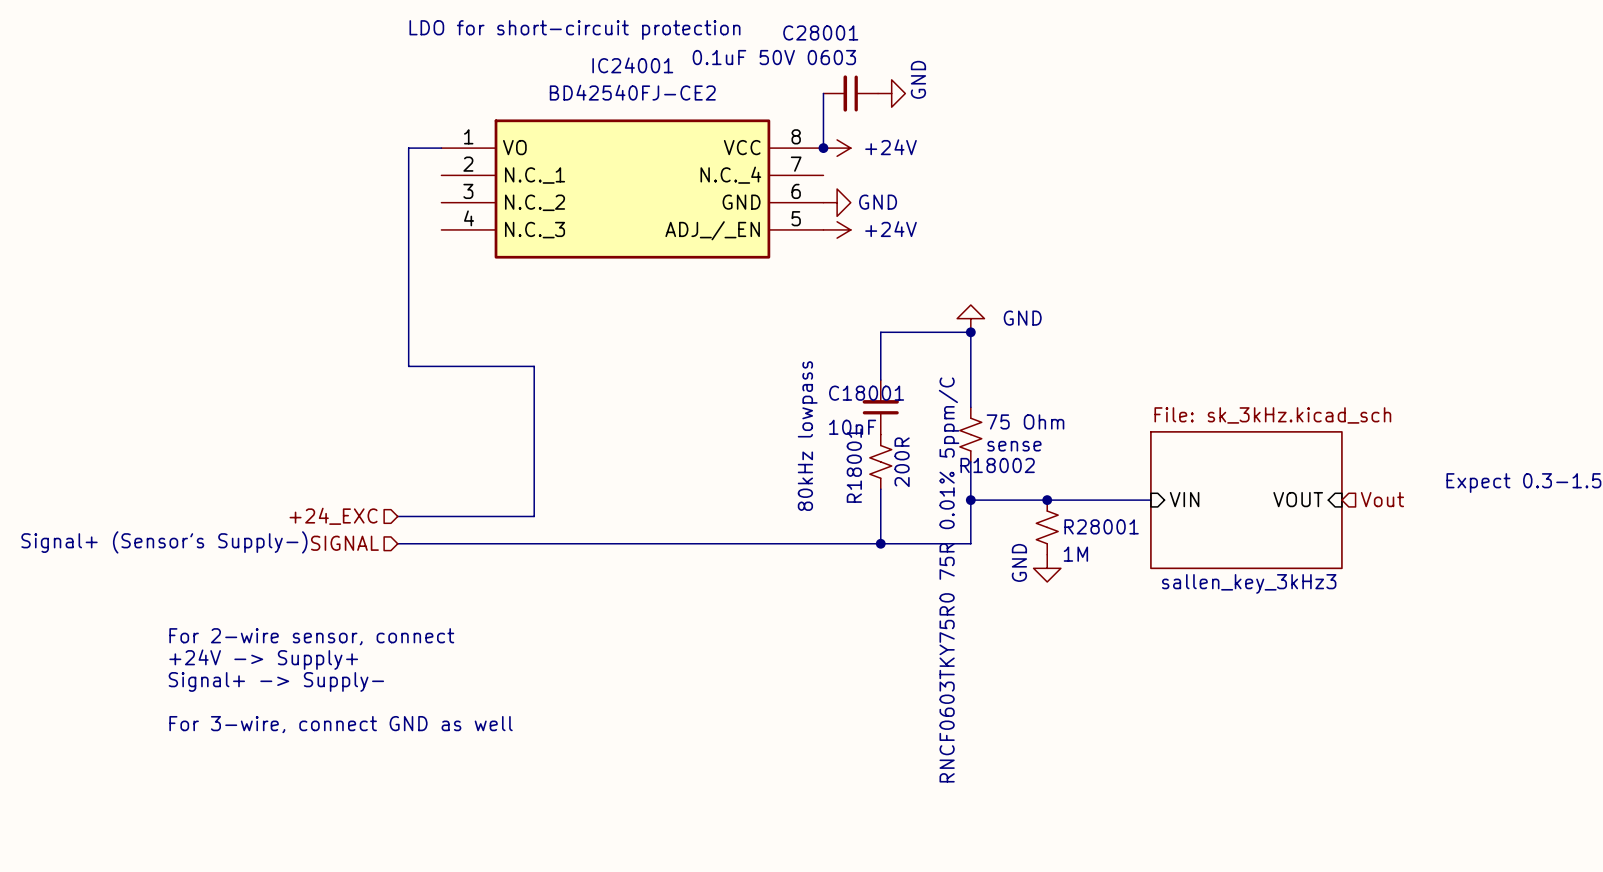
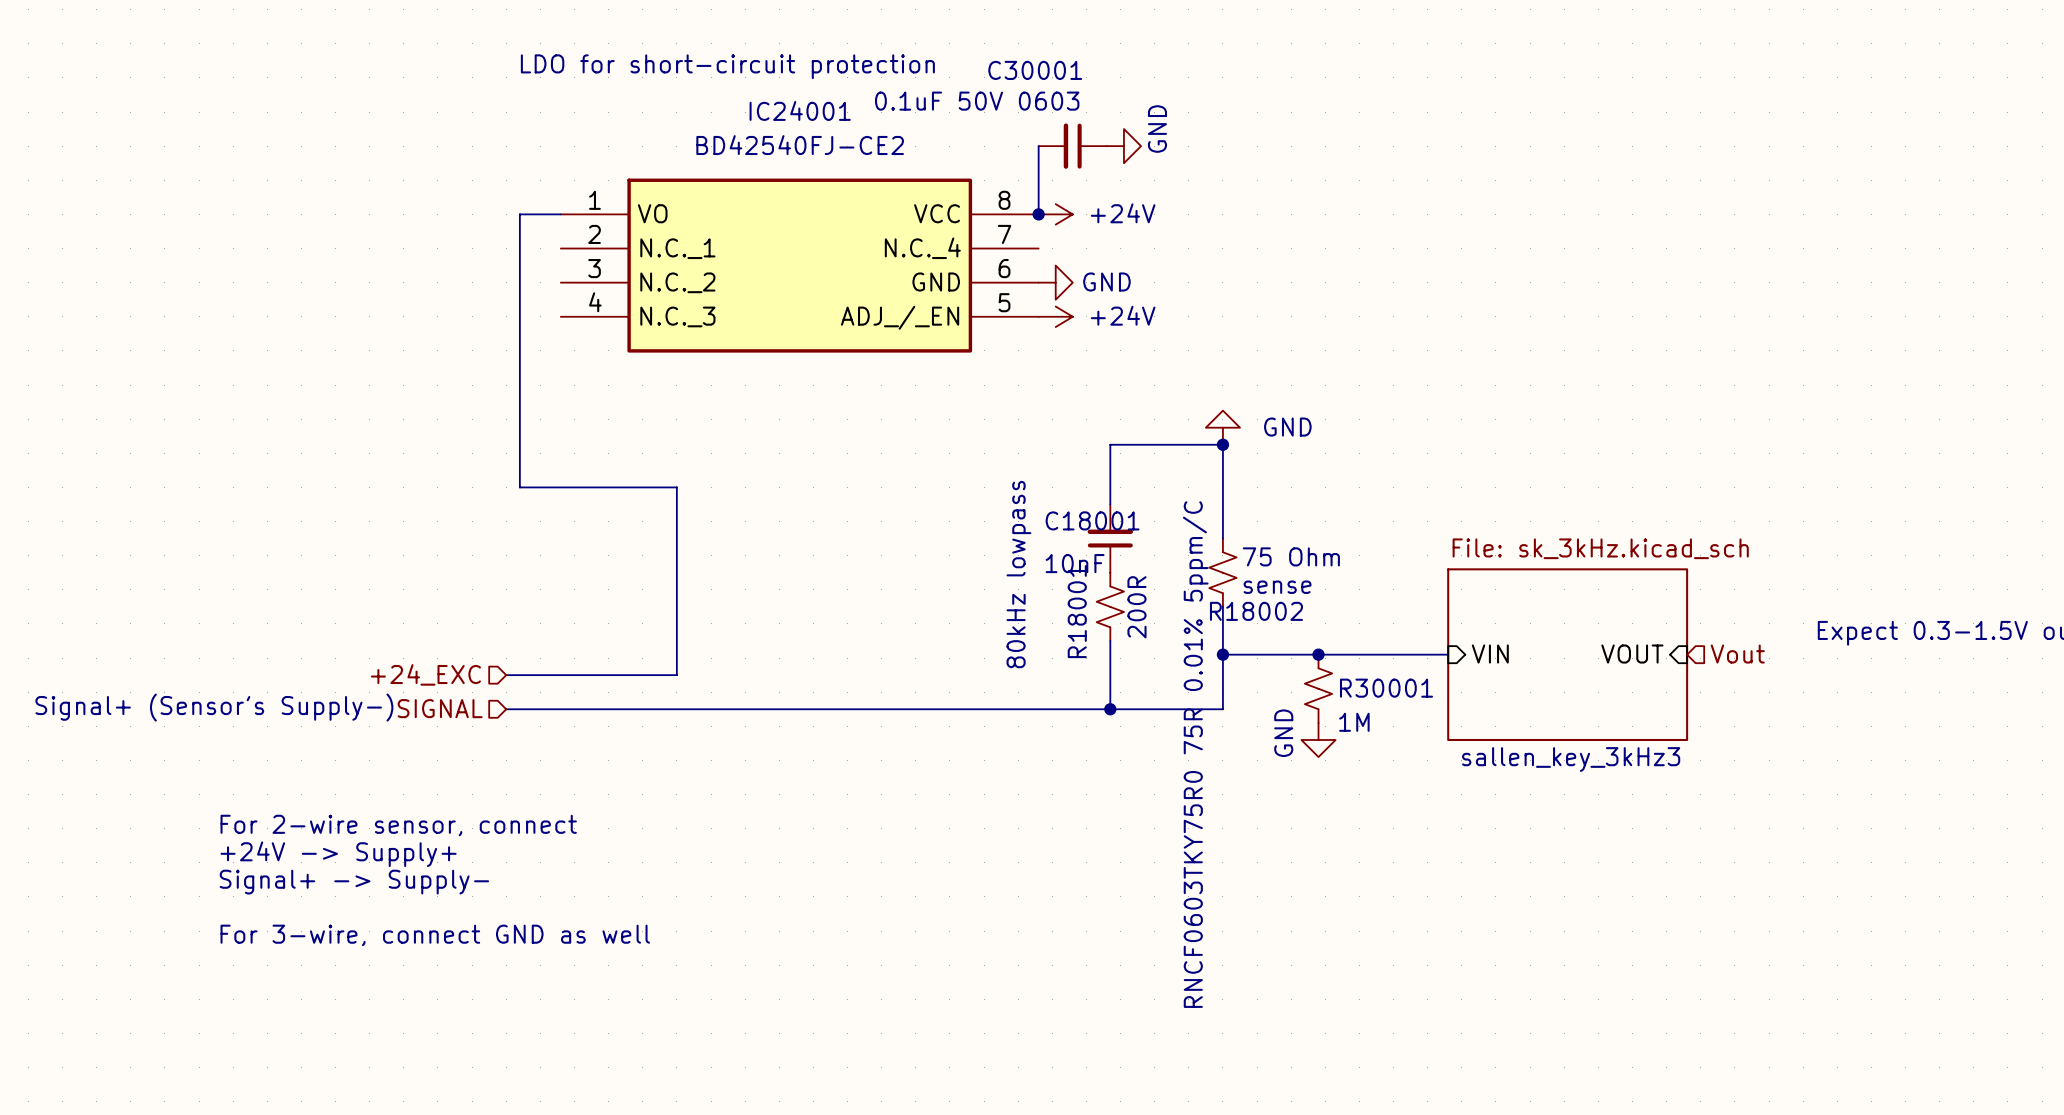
C28001 name: C28001 (820, 32) -> C30001 (1035, 70)
R28001 name: R28001 (1101, 526) -> R30001 (1386, 688)

